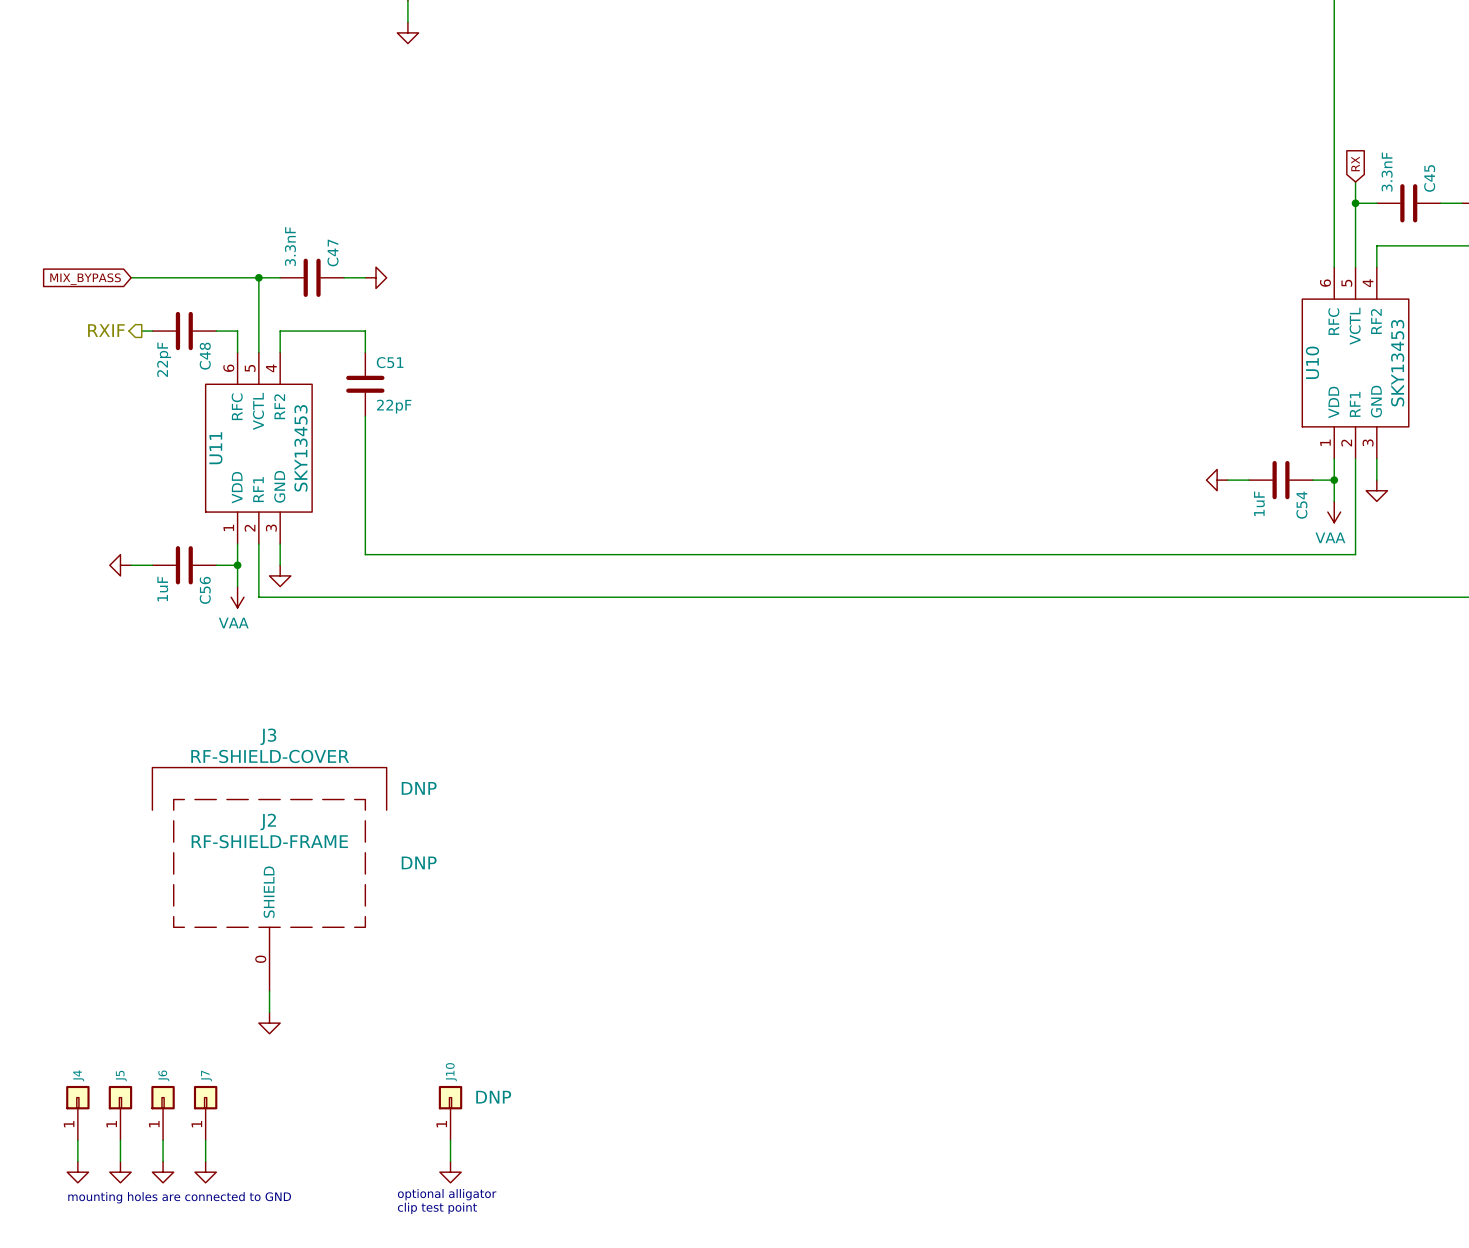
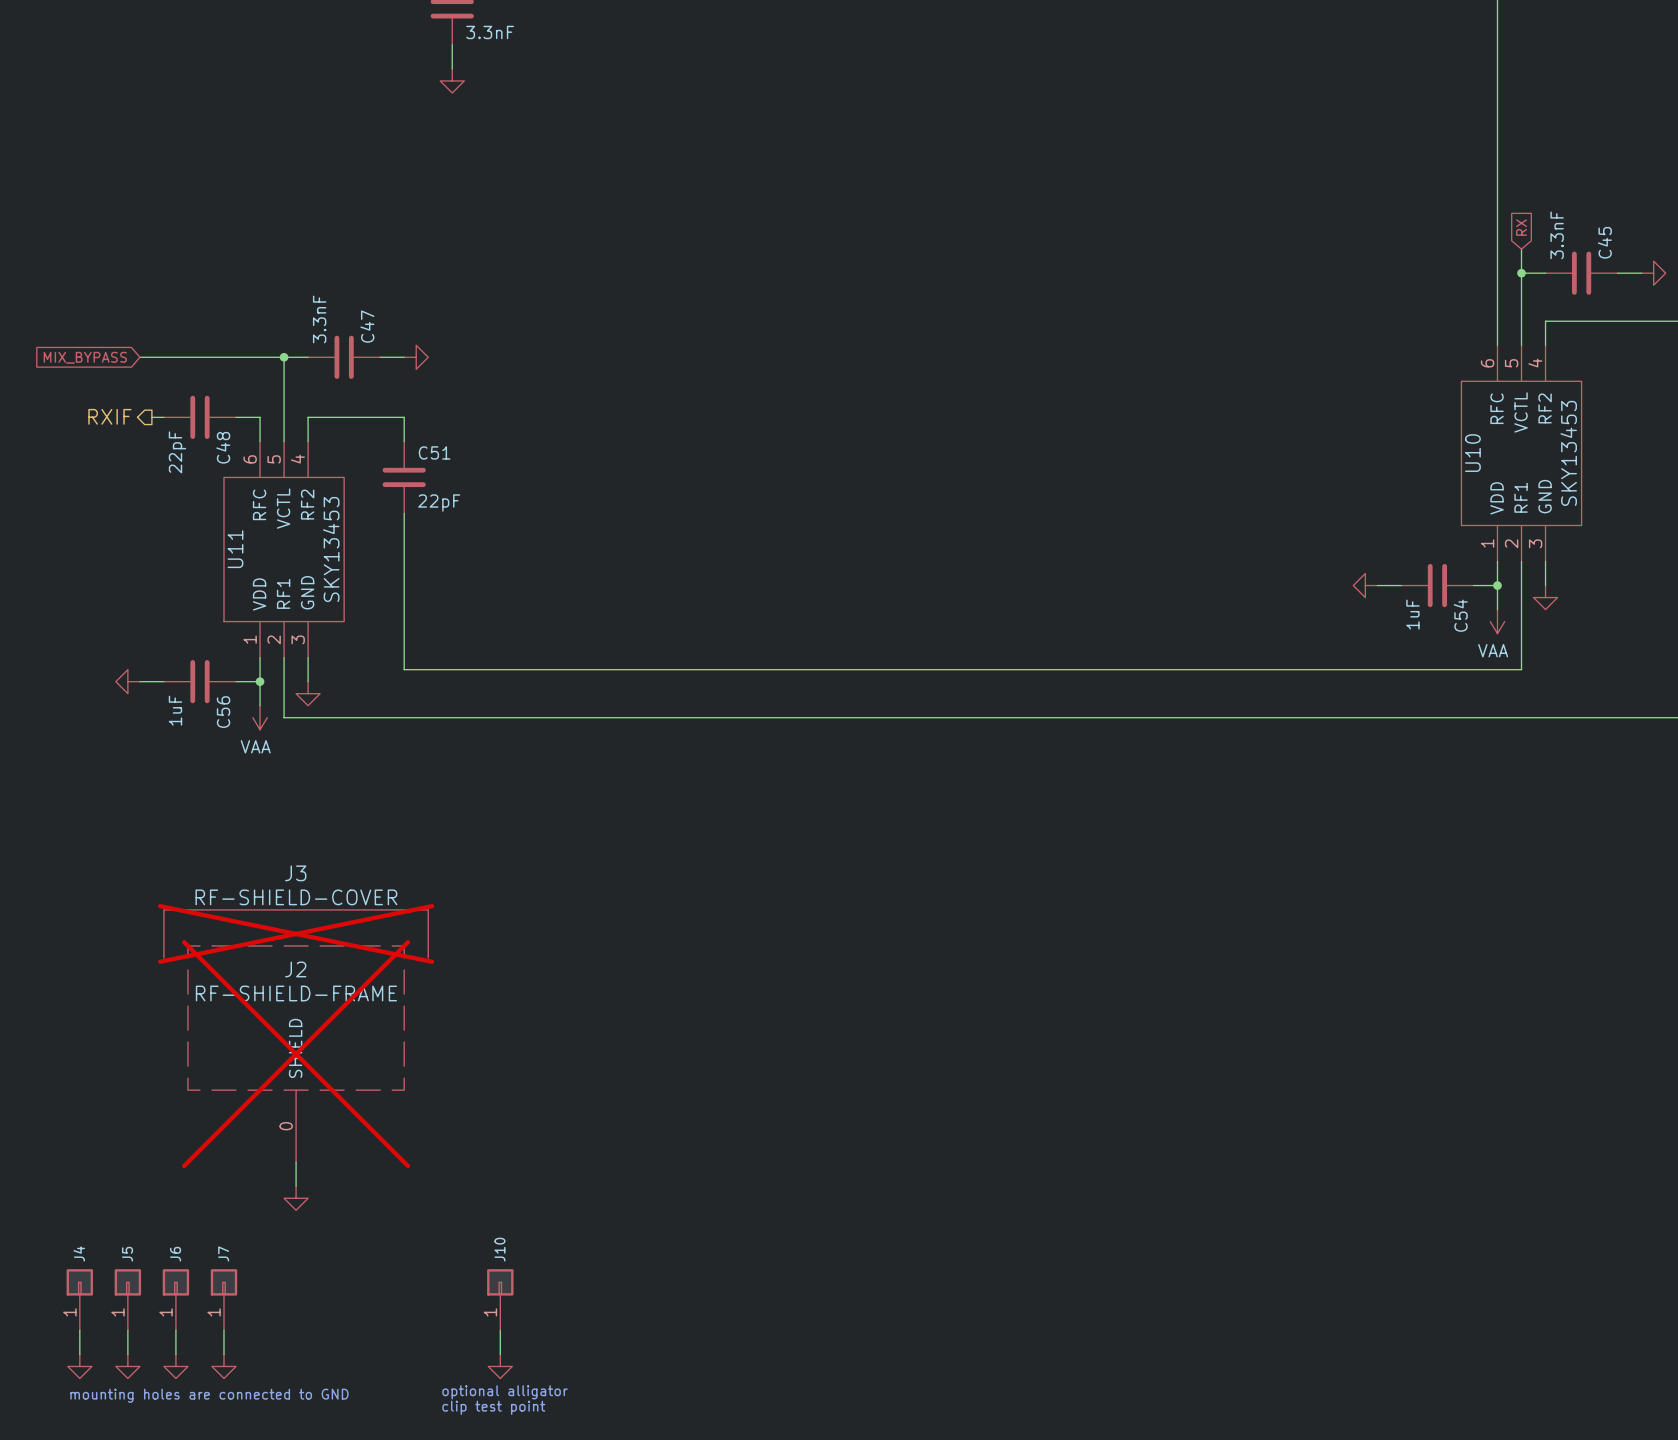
J3 do-not-place cross: none -> (296, 933)
J3 text: DNP (419, 788) -> none
J2 text: DNP (419, 862) -> none
J2 do-not-place cross: none -> (296, 1054)
J10 text: DNP (493, 1097) -> none

